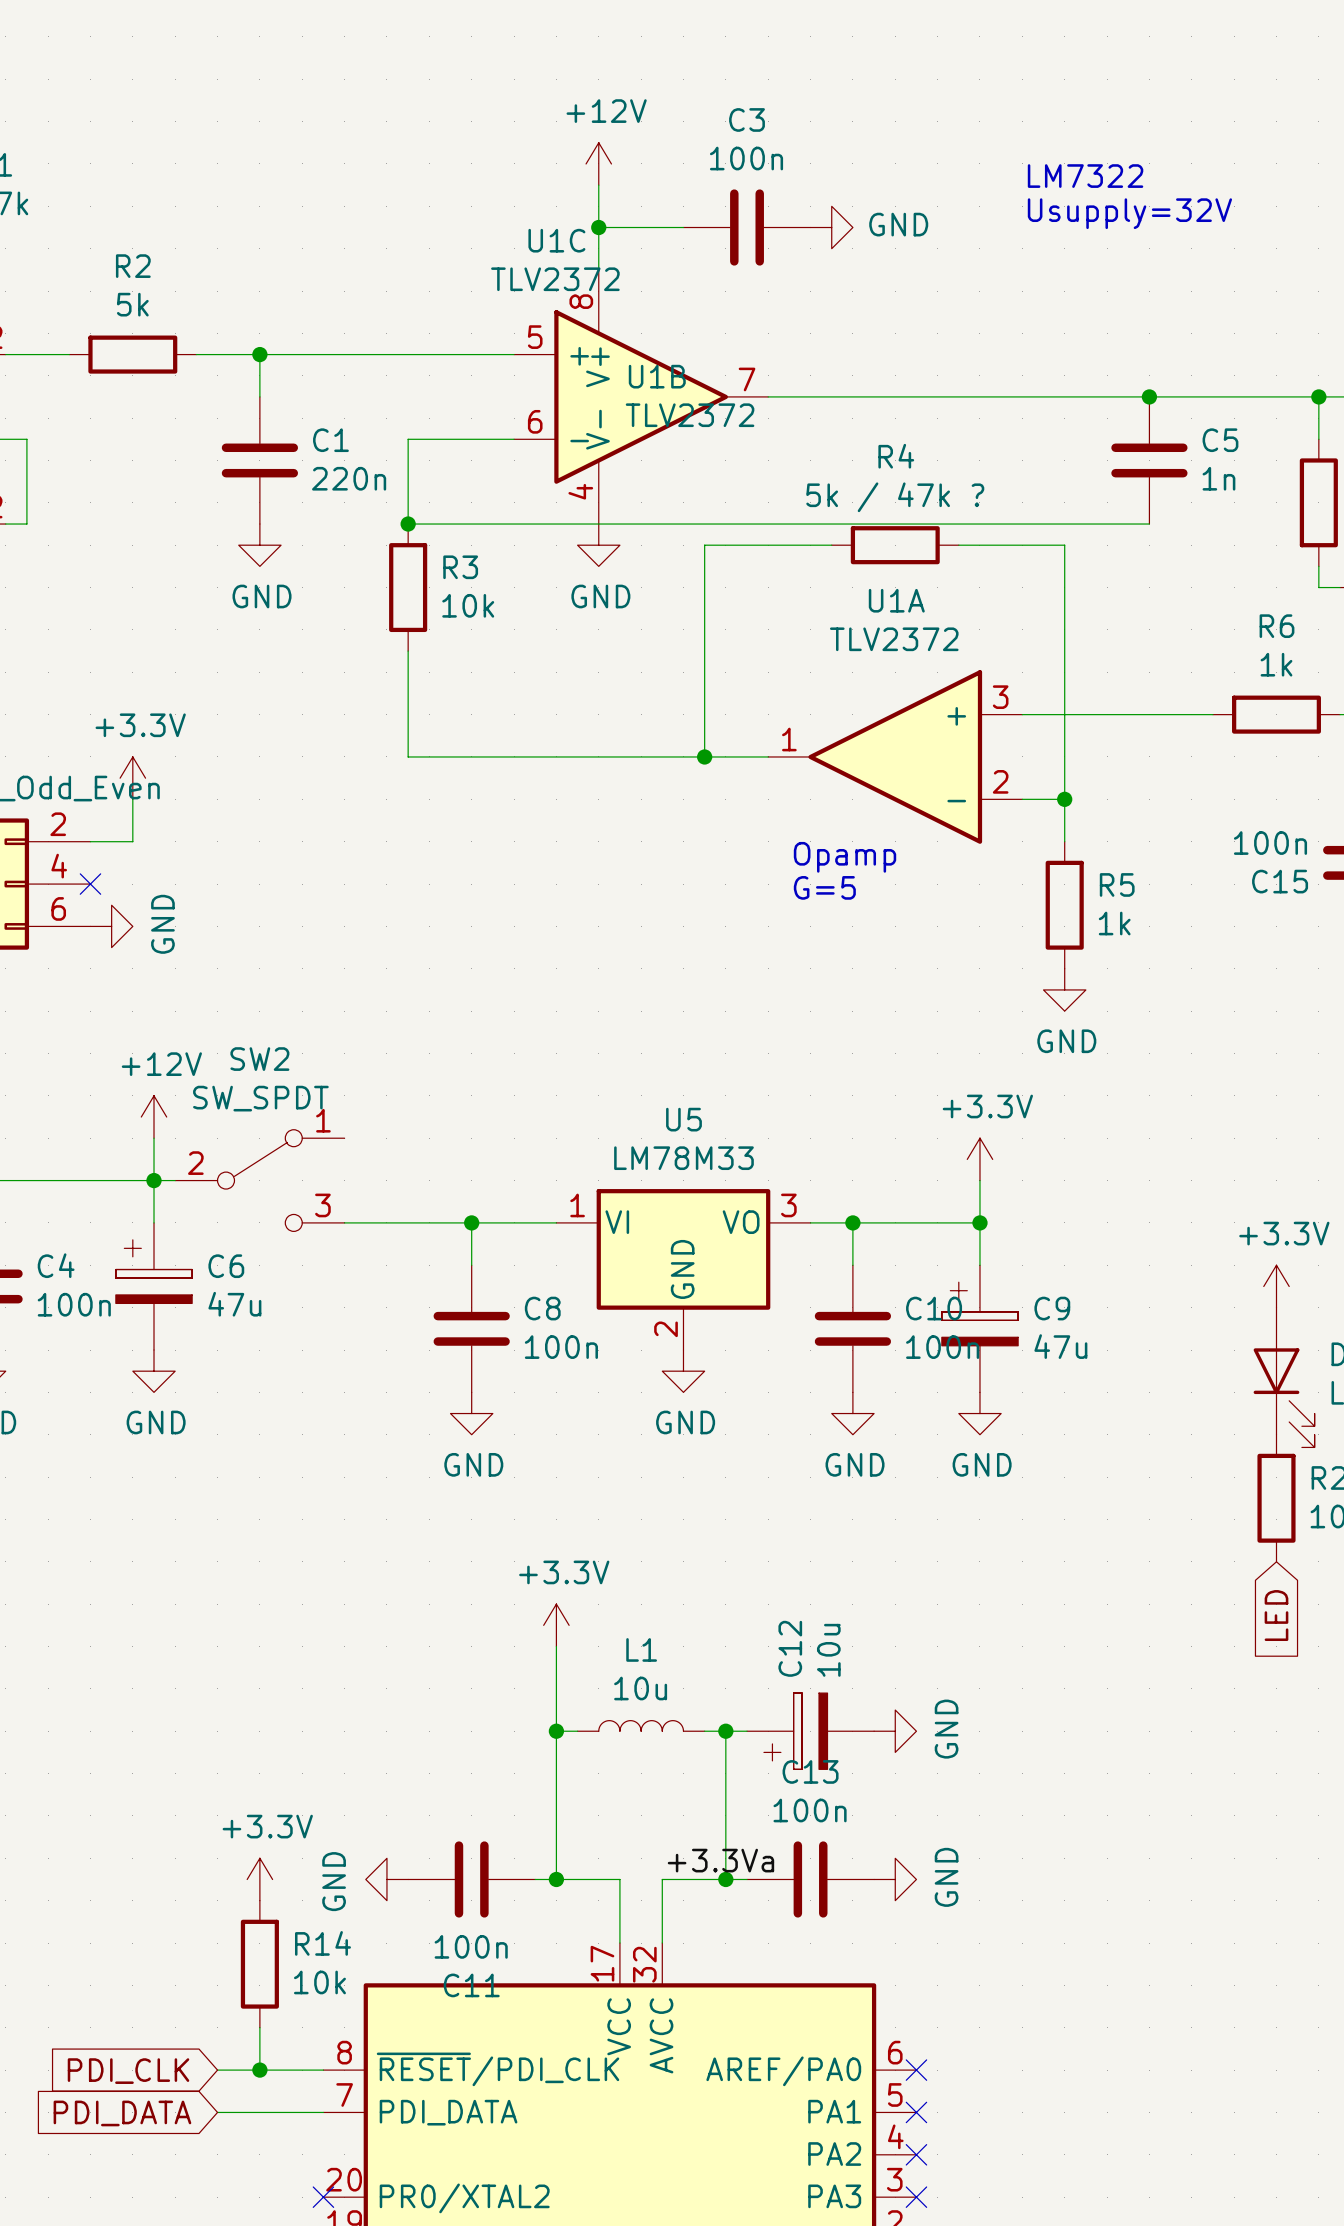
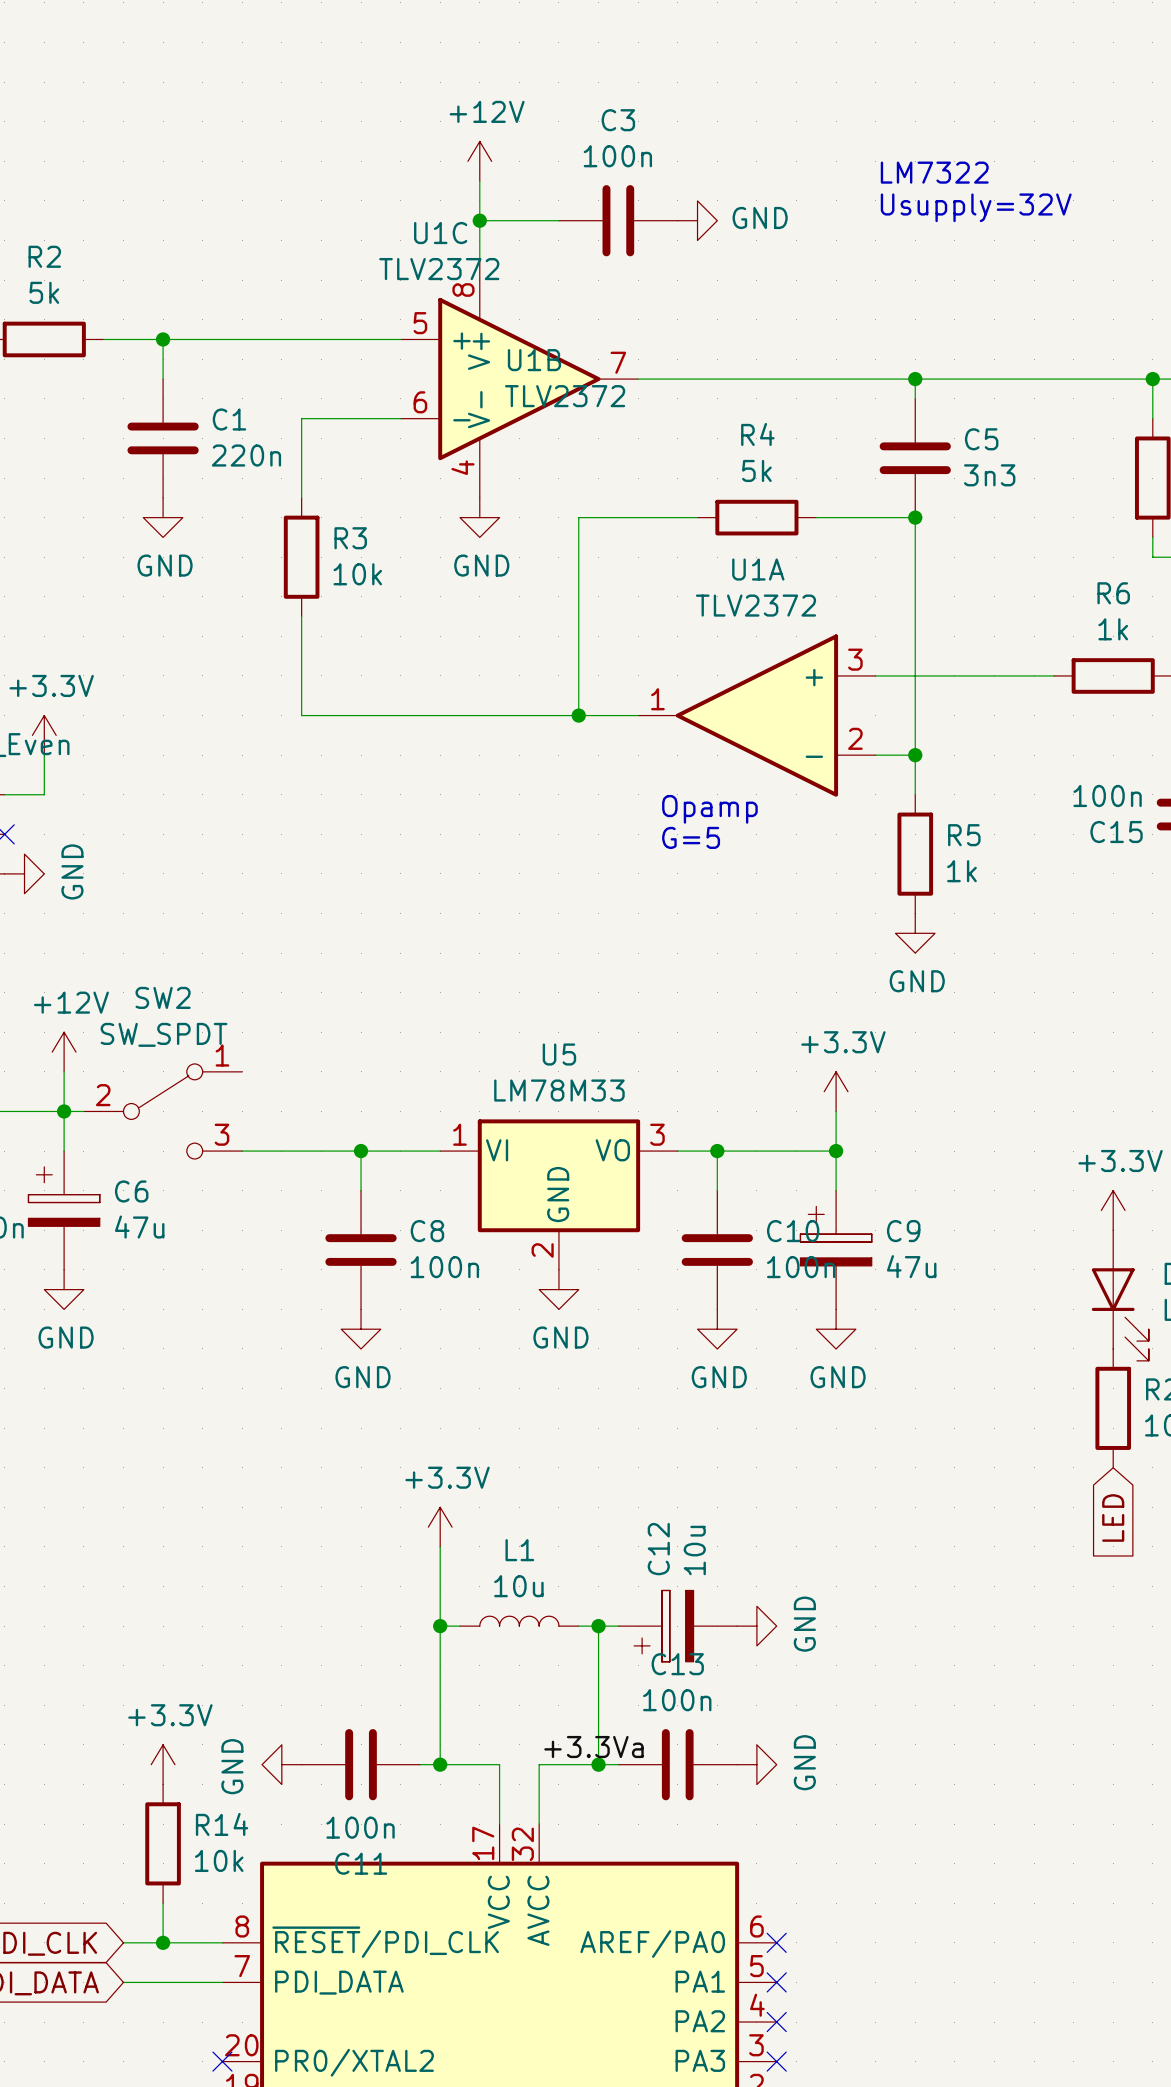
wire: none -> (915, 379) (915, 398)
junction position: (1149, 396) -> (915, 379)
C5 position: (1149, 460) -> (915, 458)
C5 value: 1n (1218, 478) -> 3n3 (989, 475)
R4 value: 5k / 47k ? (895, 497) -> 5k (756, 470)
wire: (408, 524) (1149, 524) -> none
junction: (408, 524) -> none
junction: none -> (915, 517)

